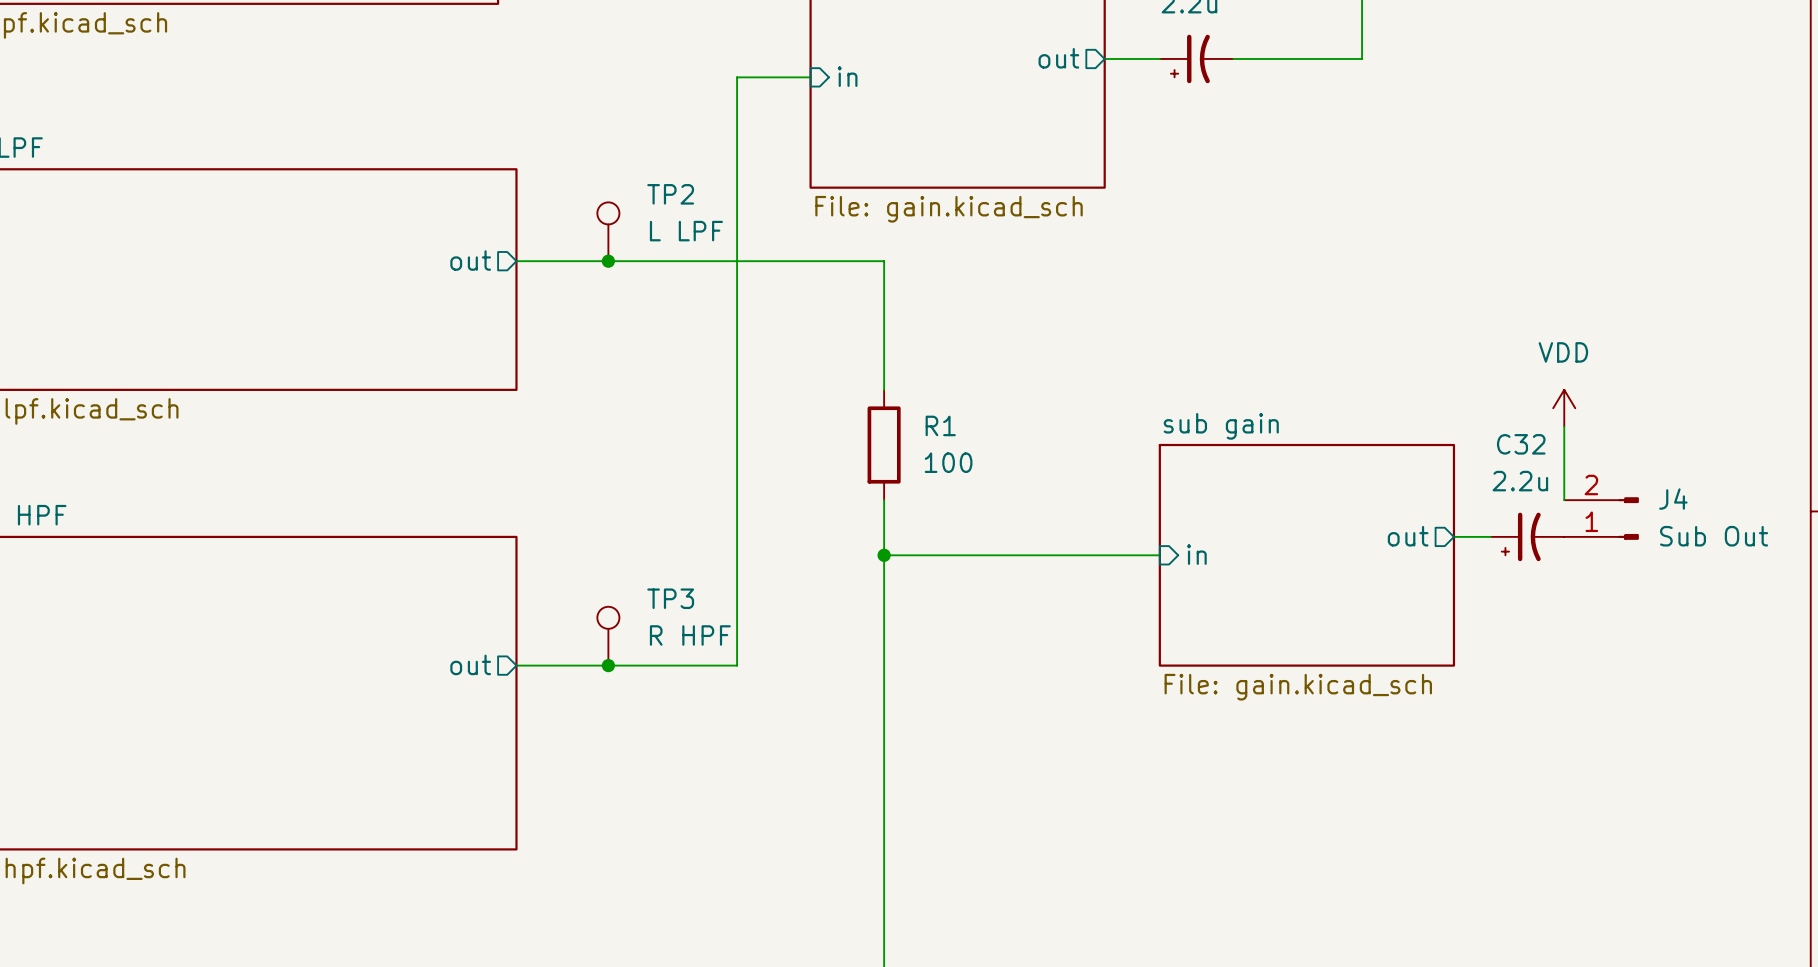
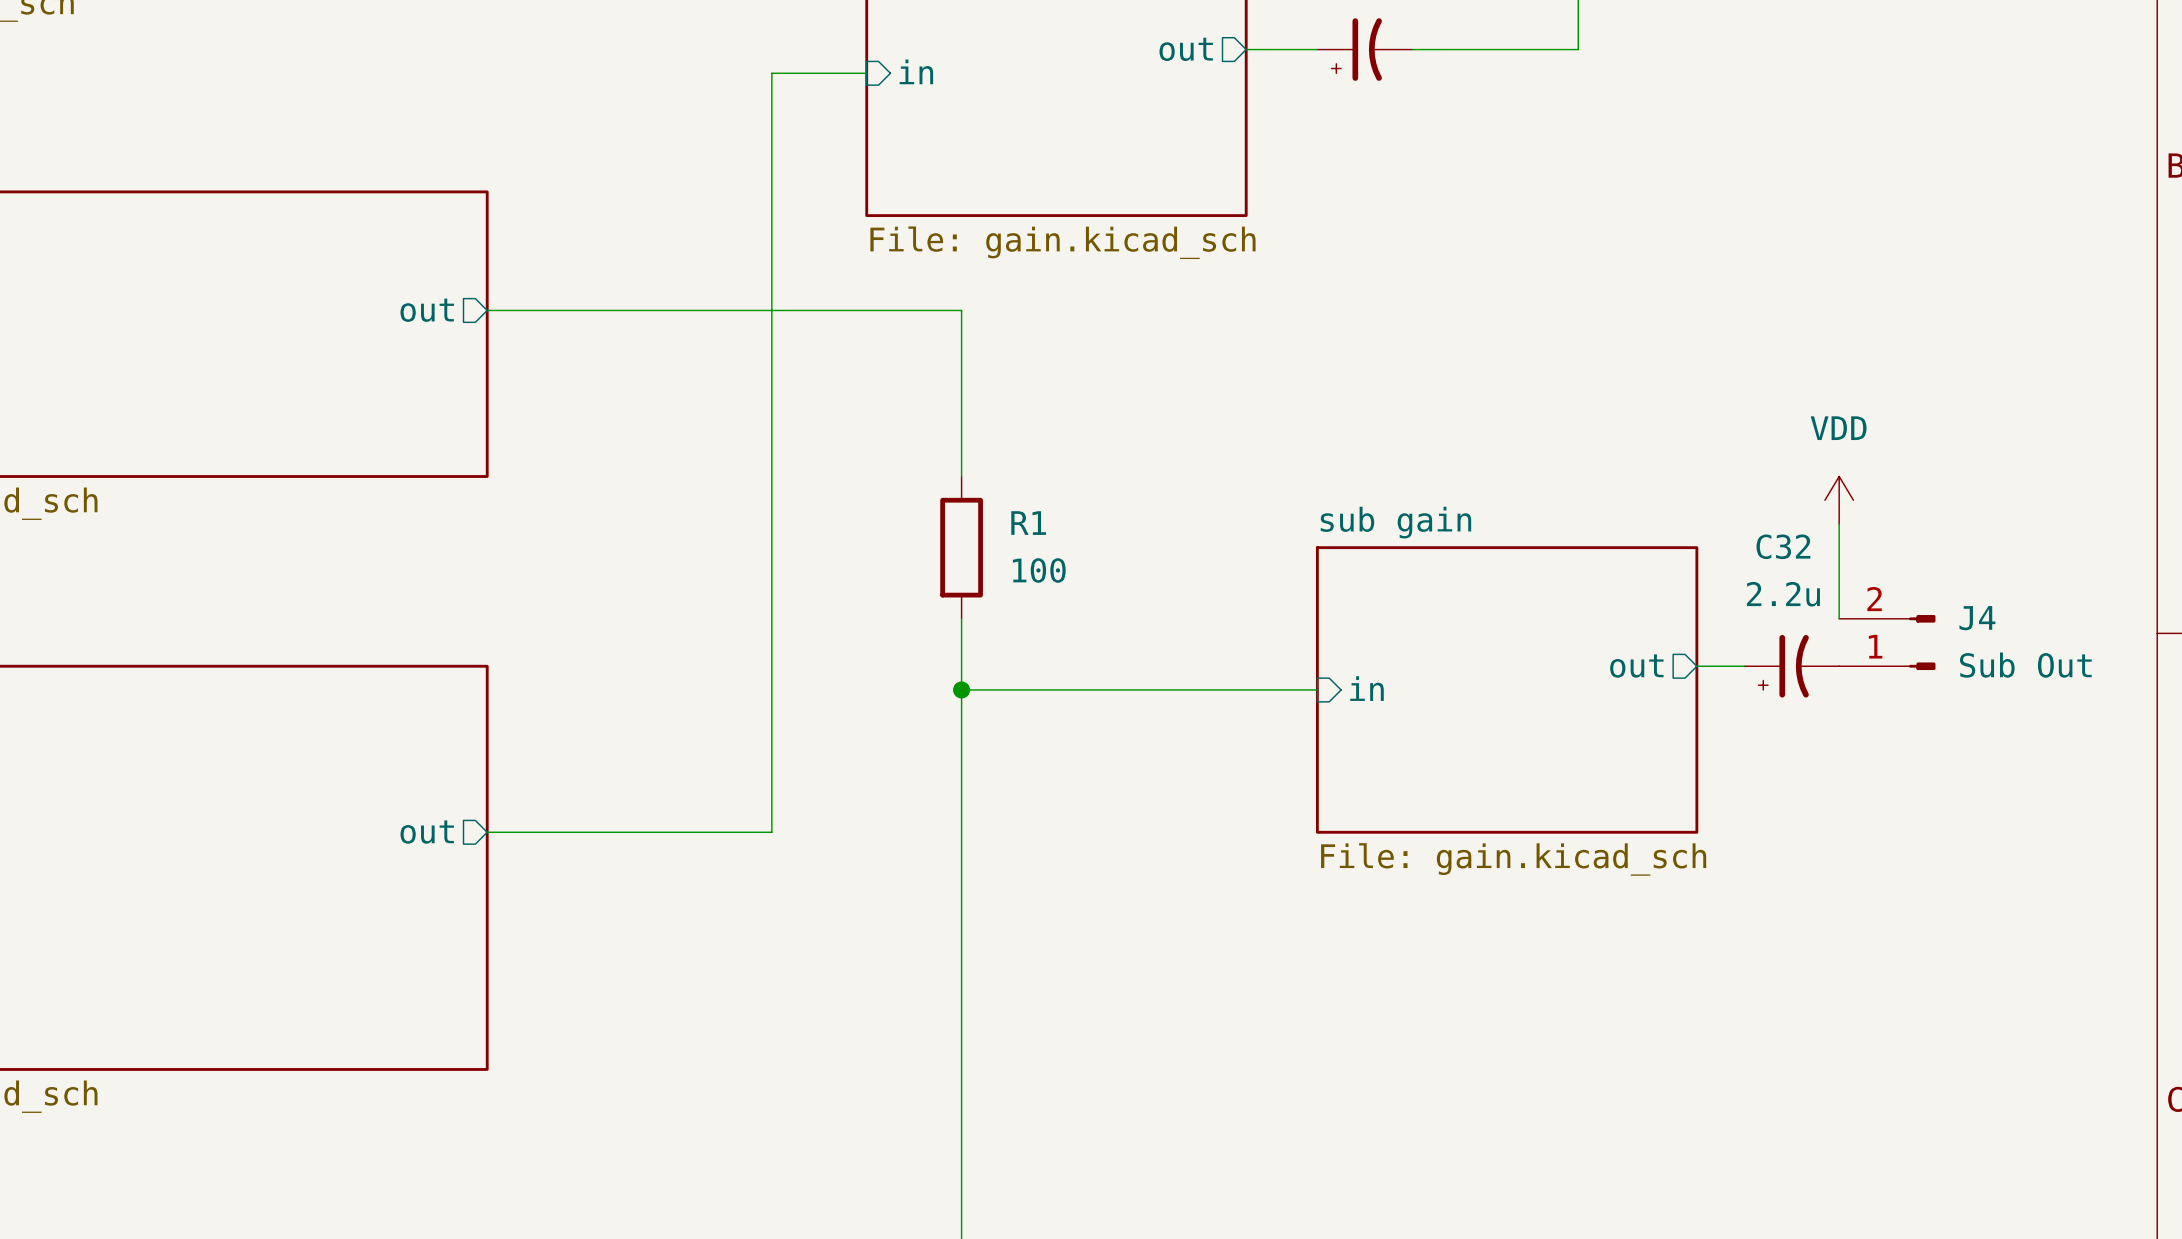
TP2: L LPF (608, 231) -> none
junction: (608, 261) -> none
TP3: R HPF (608, 636) -> none
junction: (608, 665) -> none

